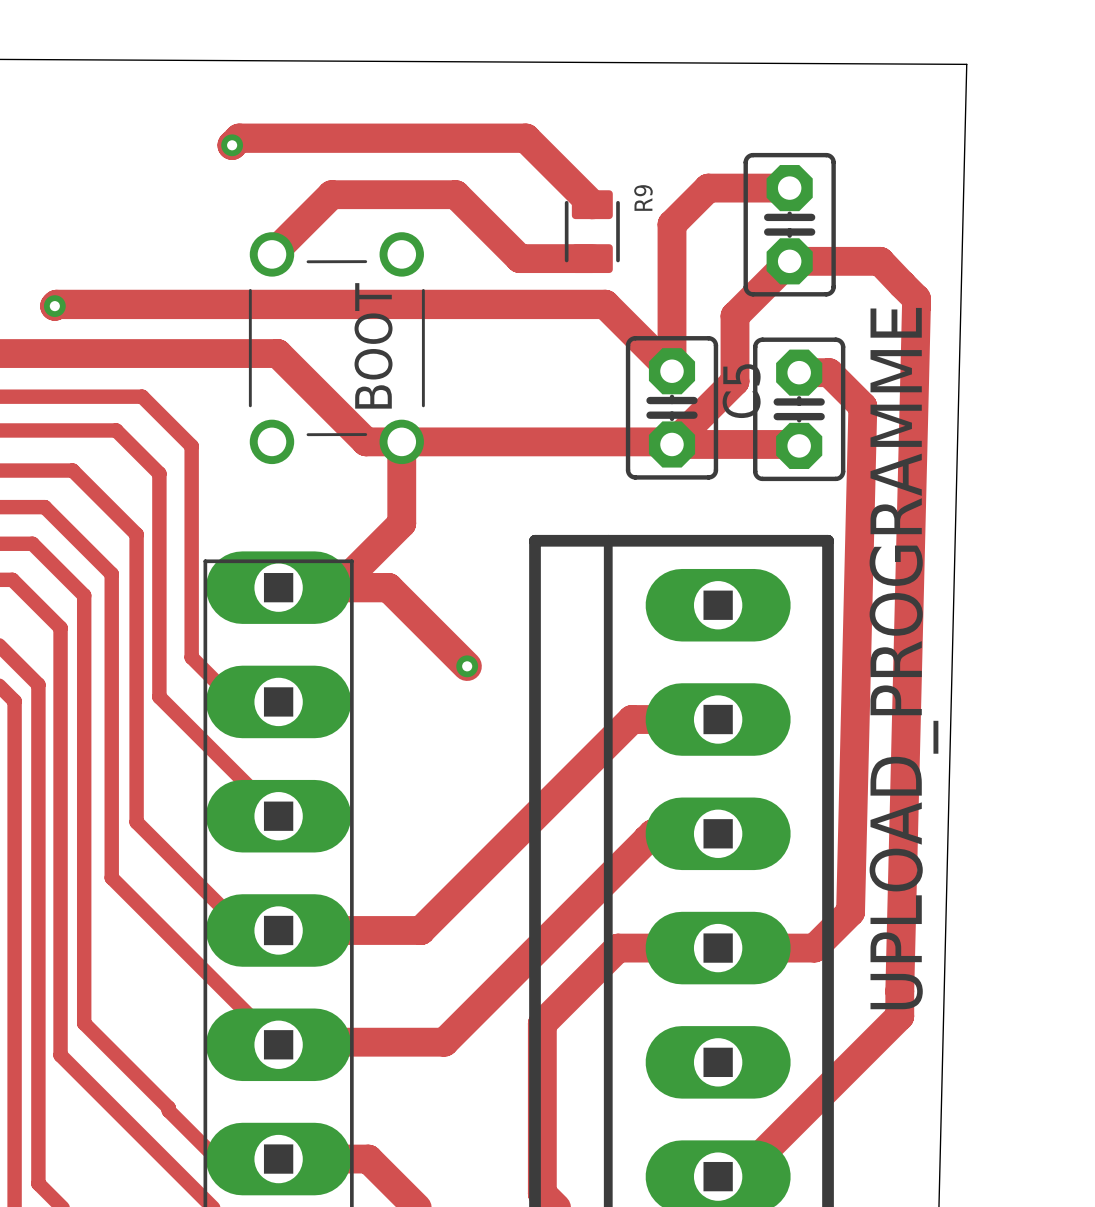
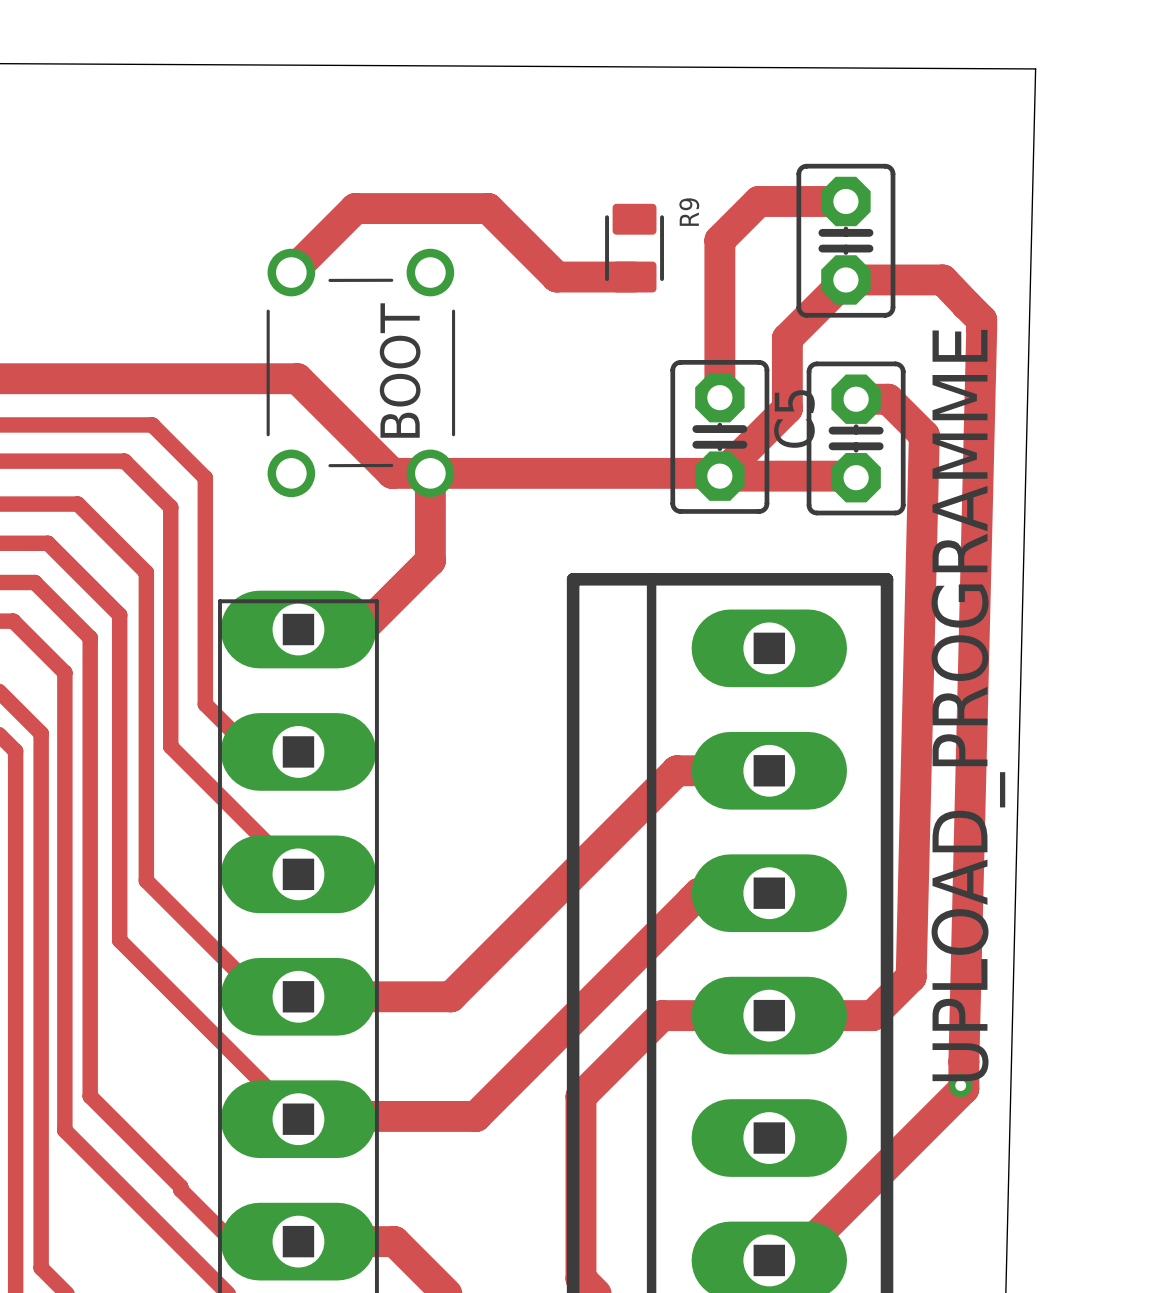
track: (232, 145) (239, 138) (525, 138) (592, 204) -> none
via: (232, 145) -> none
track: (54, 306) (56, 304) (605, 304) (672, 371) -> none
via: (54, 306) -> none
track: (278, 587) (388, 587) (467, 666) -> none
via: (467, 666) -> none
via: none -> (960, 1085)

